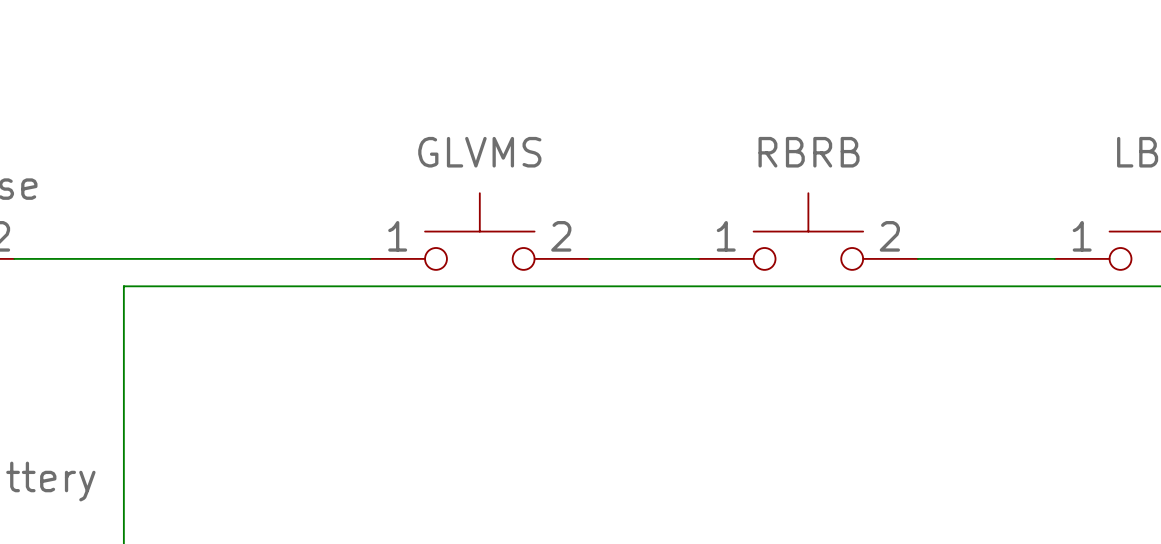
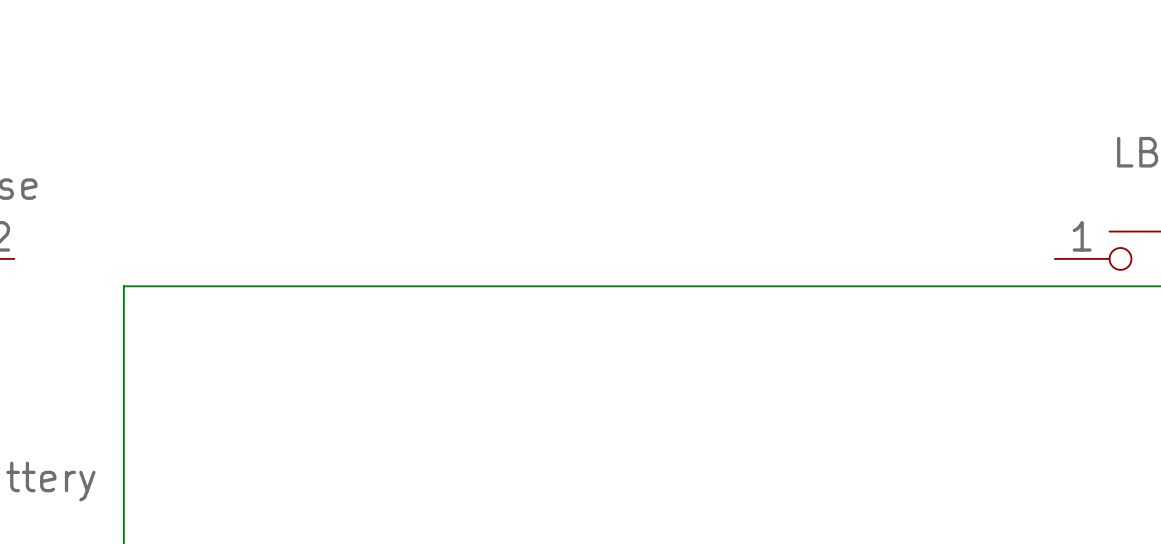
part: GLVMS (479, 231) -> none
part: RBRB (808, 231) -> none
wire: (14, 258) (370, 258) -> none
wire: (589, 258) (698, 258) -> none
wire: (917, 258) (1054, 258) -> none

